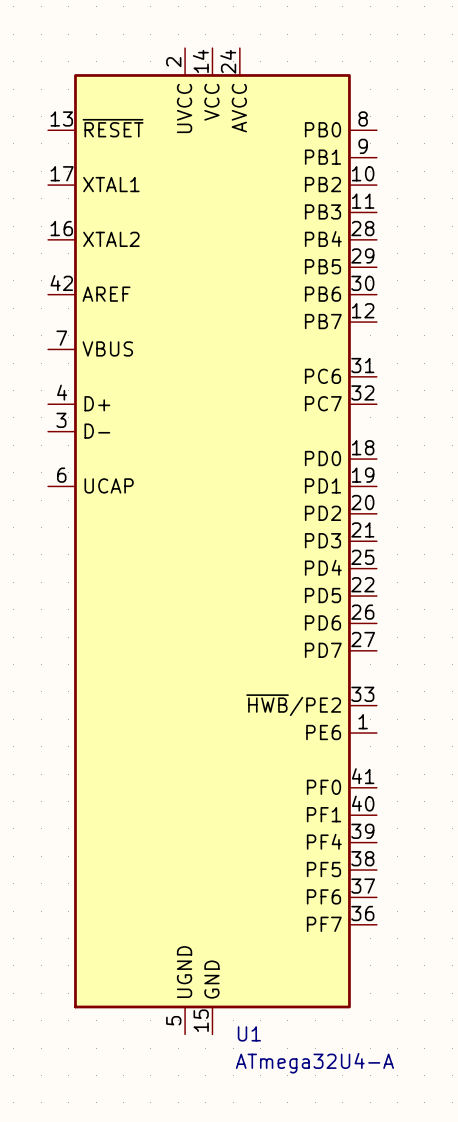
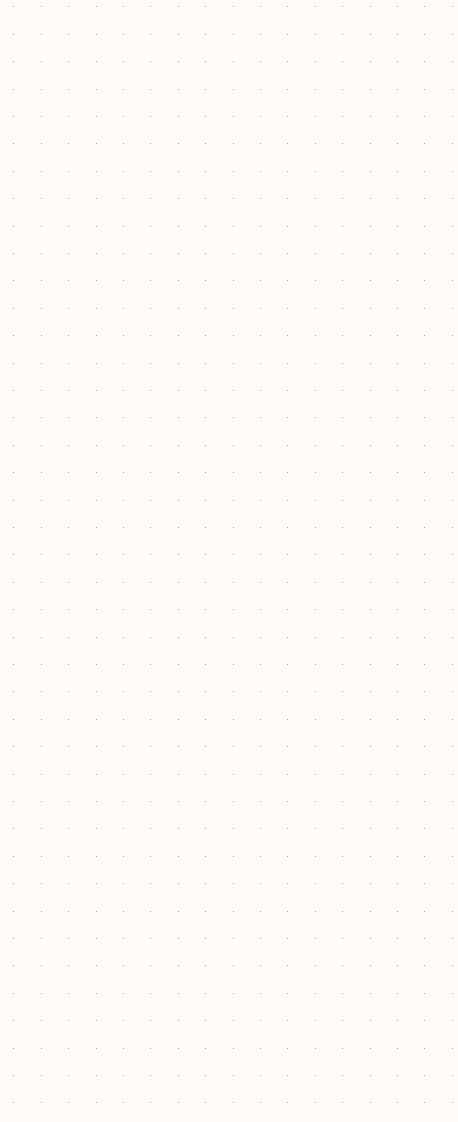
U1: ATmega32U4-A (212, 541) -> none

